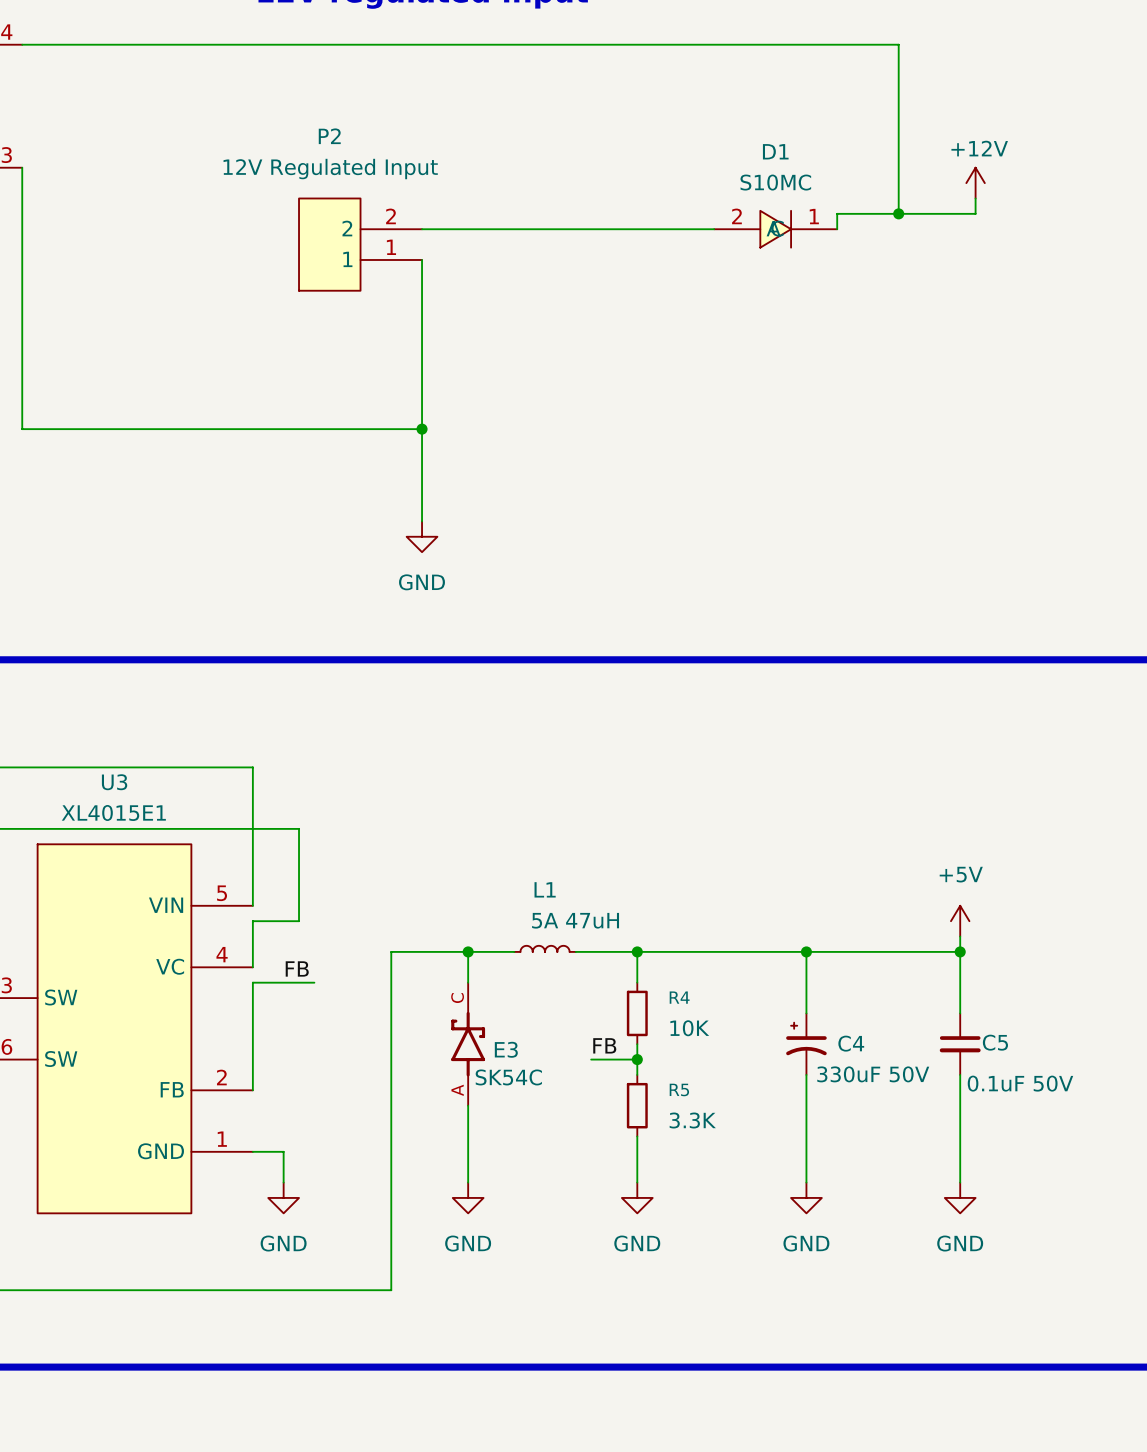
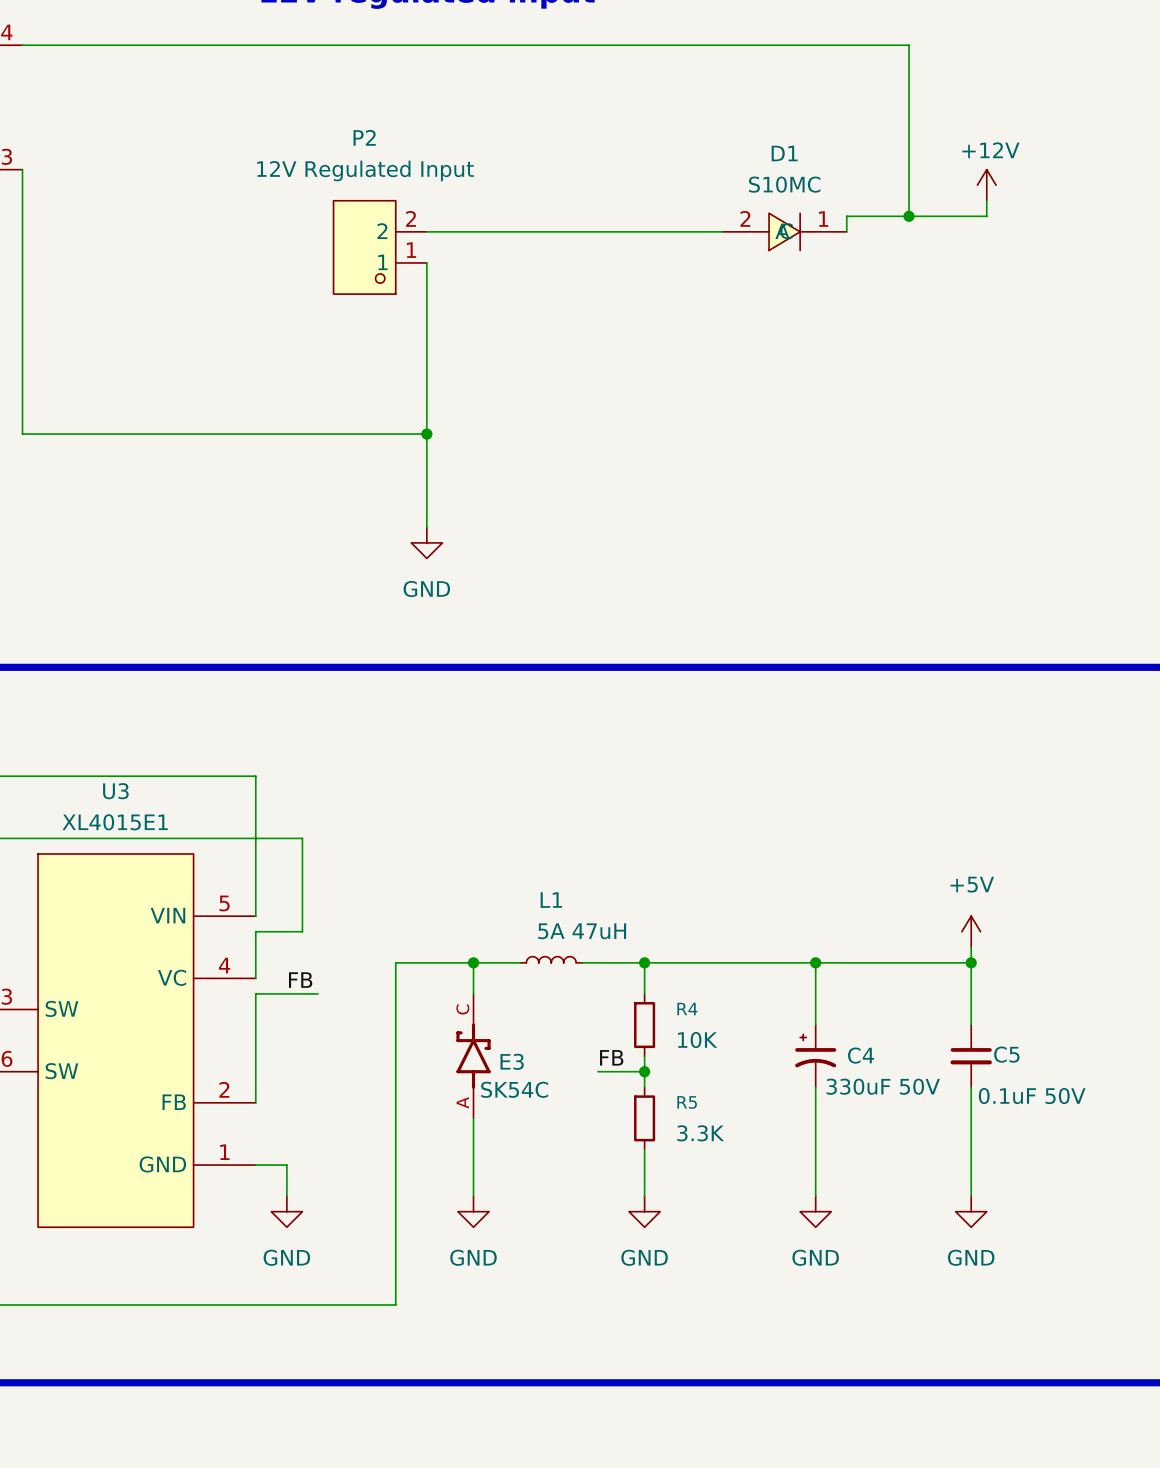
P2 symbol: [299, 198, 423, 291] -> [333, 200, 427, 295]

